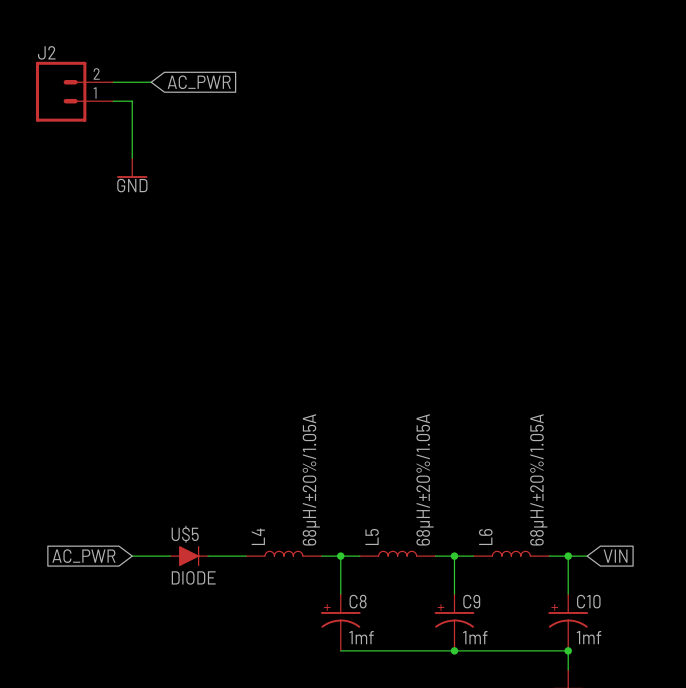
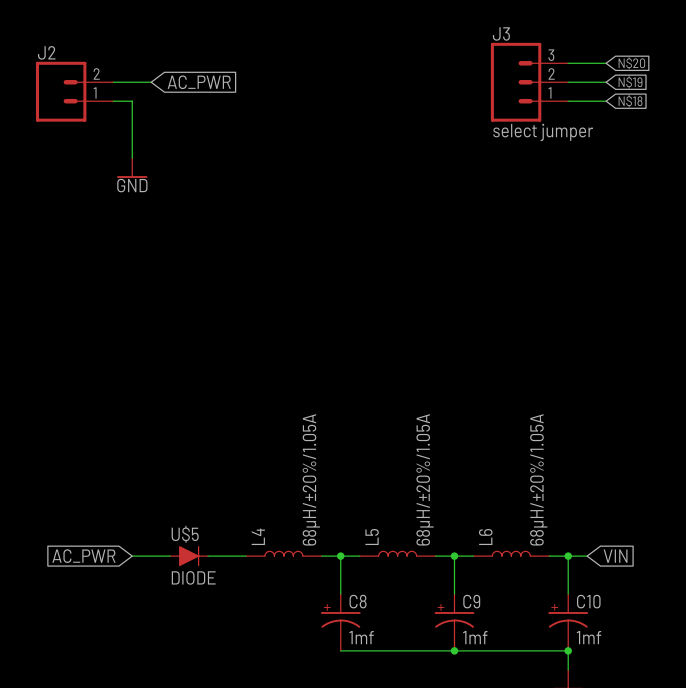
wire: none -> (568, 63) (606, 63)
global label: none -> N$20 (631, 63)
J3: none -> select jumper (529, 82)
wire: none -> (568, 82) (606, 82)
global label: none -> N$19 (630, 82)
wire: none -> (568, 101) (606, 101)
global label: none -> N$18 (630, 101)

